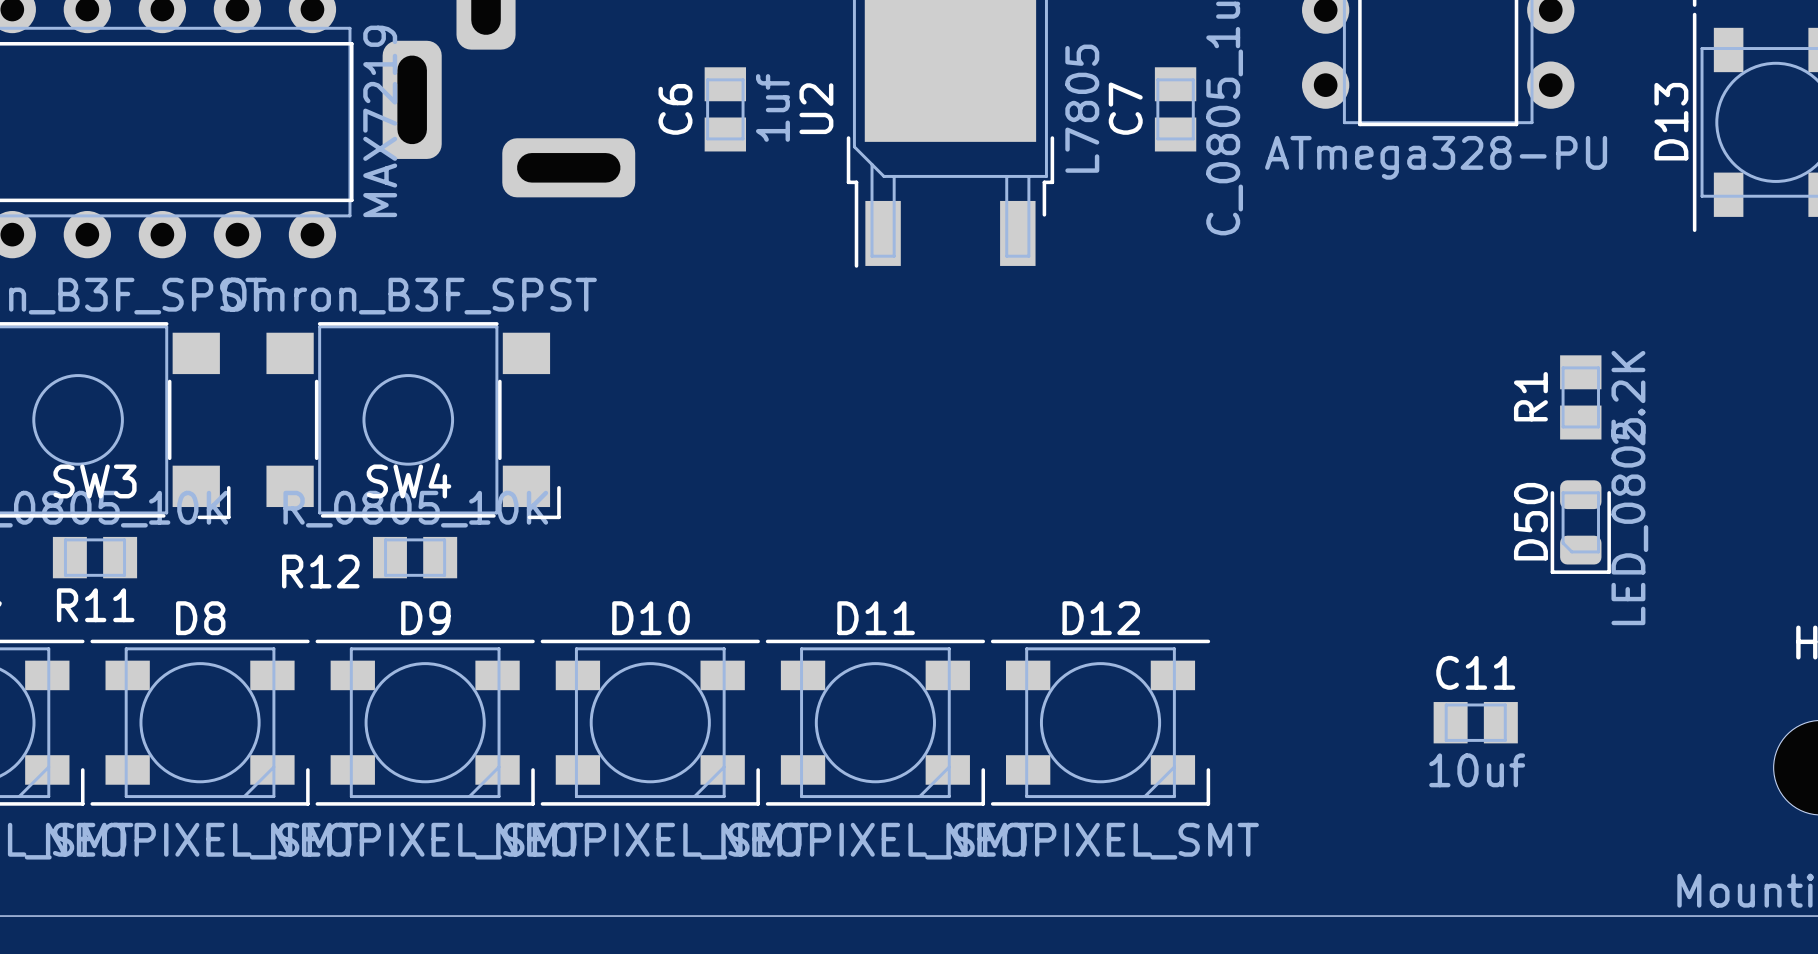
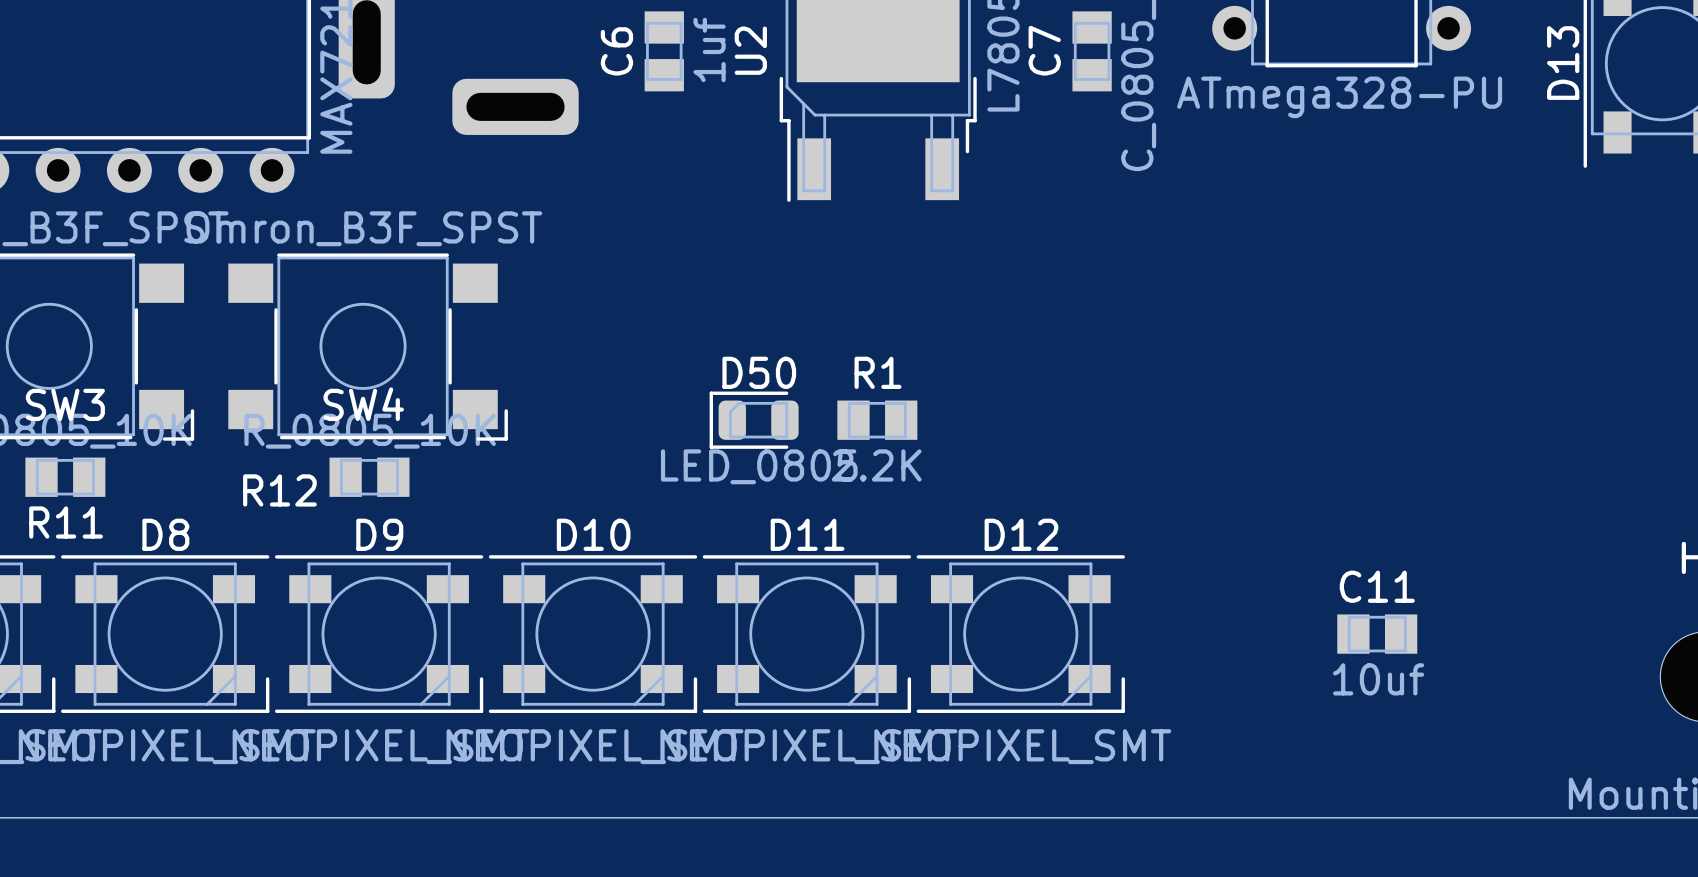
R1 rotation: 0° (1580, 397) -> 90° clockwise (877, 420)
R1 position: (1580, 397) -> (877, 420)
D50 rotation: 0° (1580, 527) -> 90° clockwise (754, 420)
D50 position: (1580, 527) -> (754, 420)

